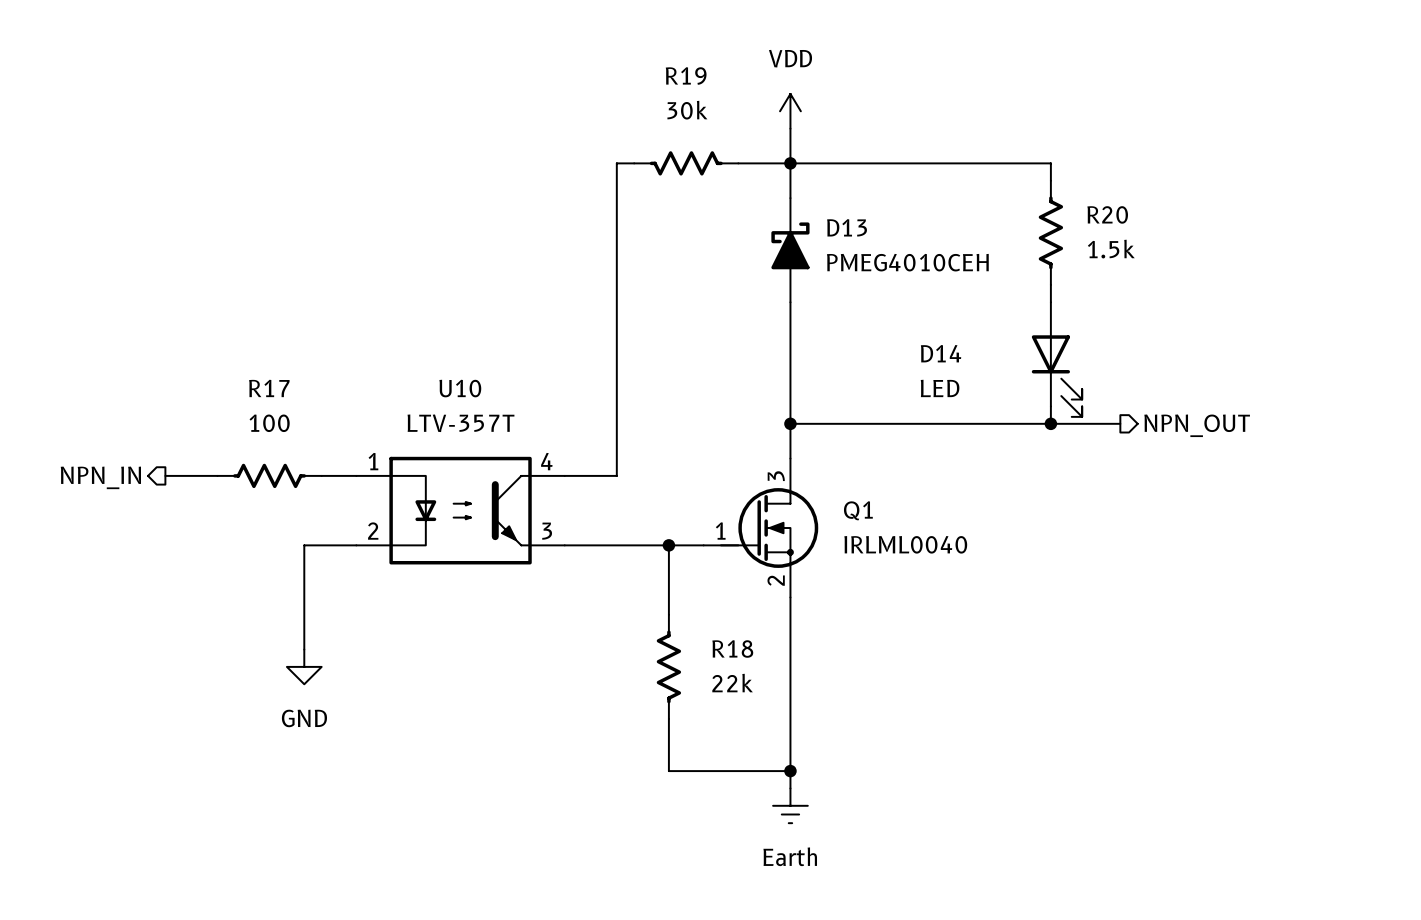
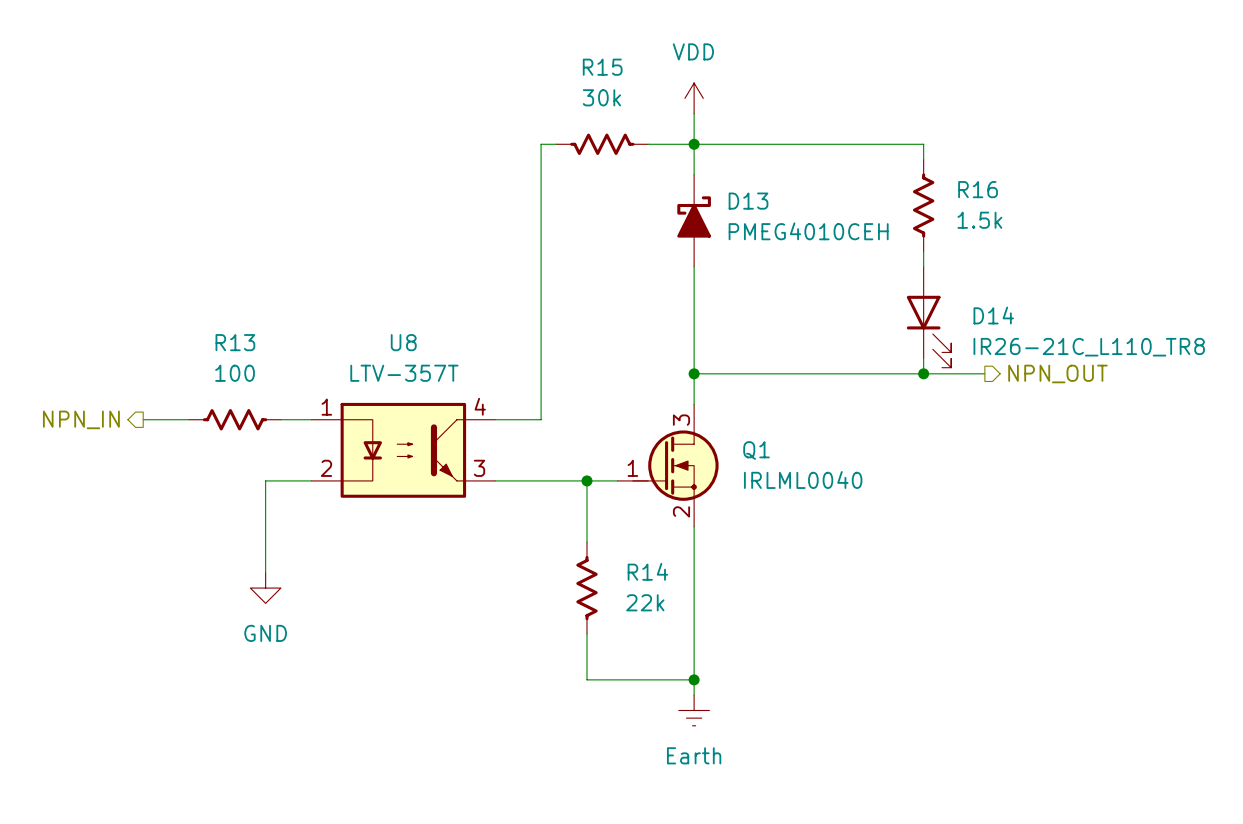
R19 name: R19 (686, 76) -> R15 (602, 67)
R20 name: R20 (1107, 214) -> R16 (978, 189)
D14 name position: D14 (941, 353) -> D14 (993, 315)
R17 name: R17 (269, 388) -> R13 (235, 342)
U10 name: U10 (460, 388) -> U8 (403, 342)
D14 value: LED (940, 388) -> IR26-21C_L110_TR8 (1089, 347)
R18 name: R18 (732, 648) -> R14 (647, 571)

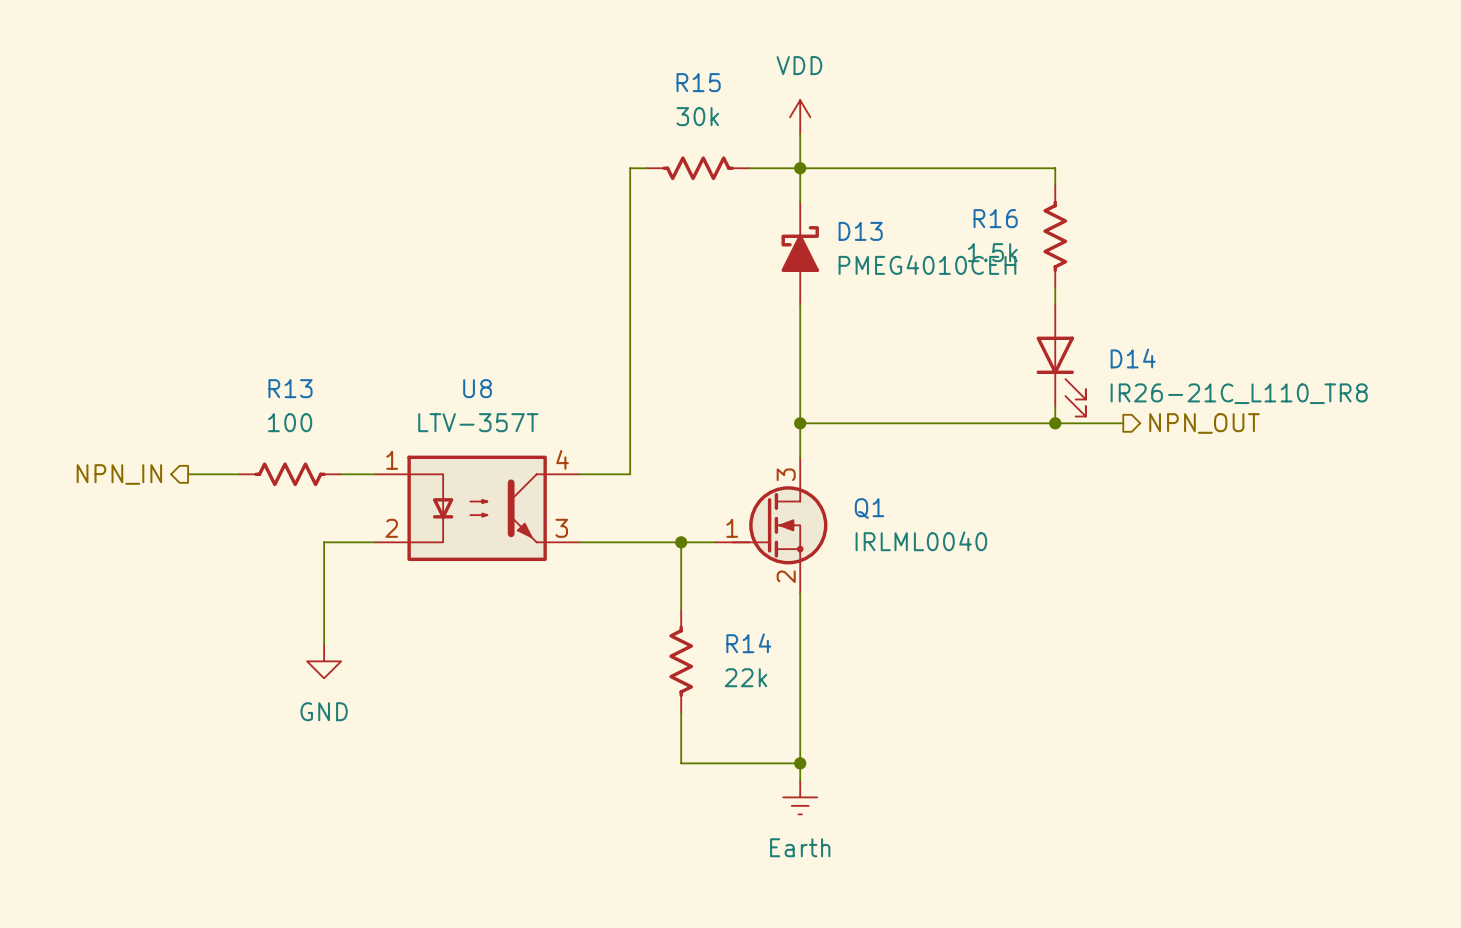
R16 flip: as is (923, 205) -> left-right (1055, 236)

